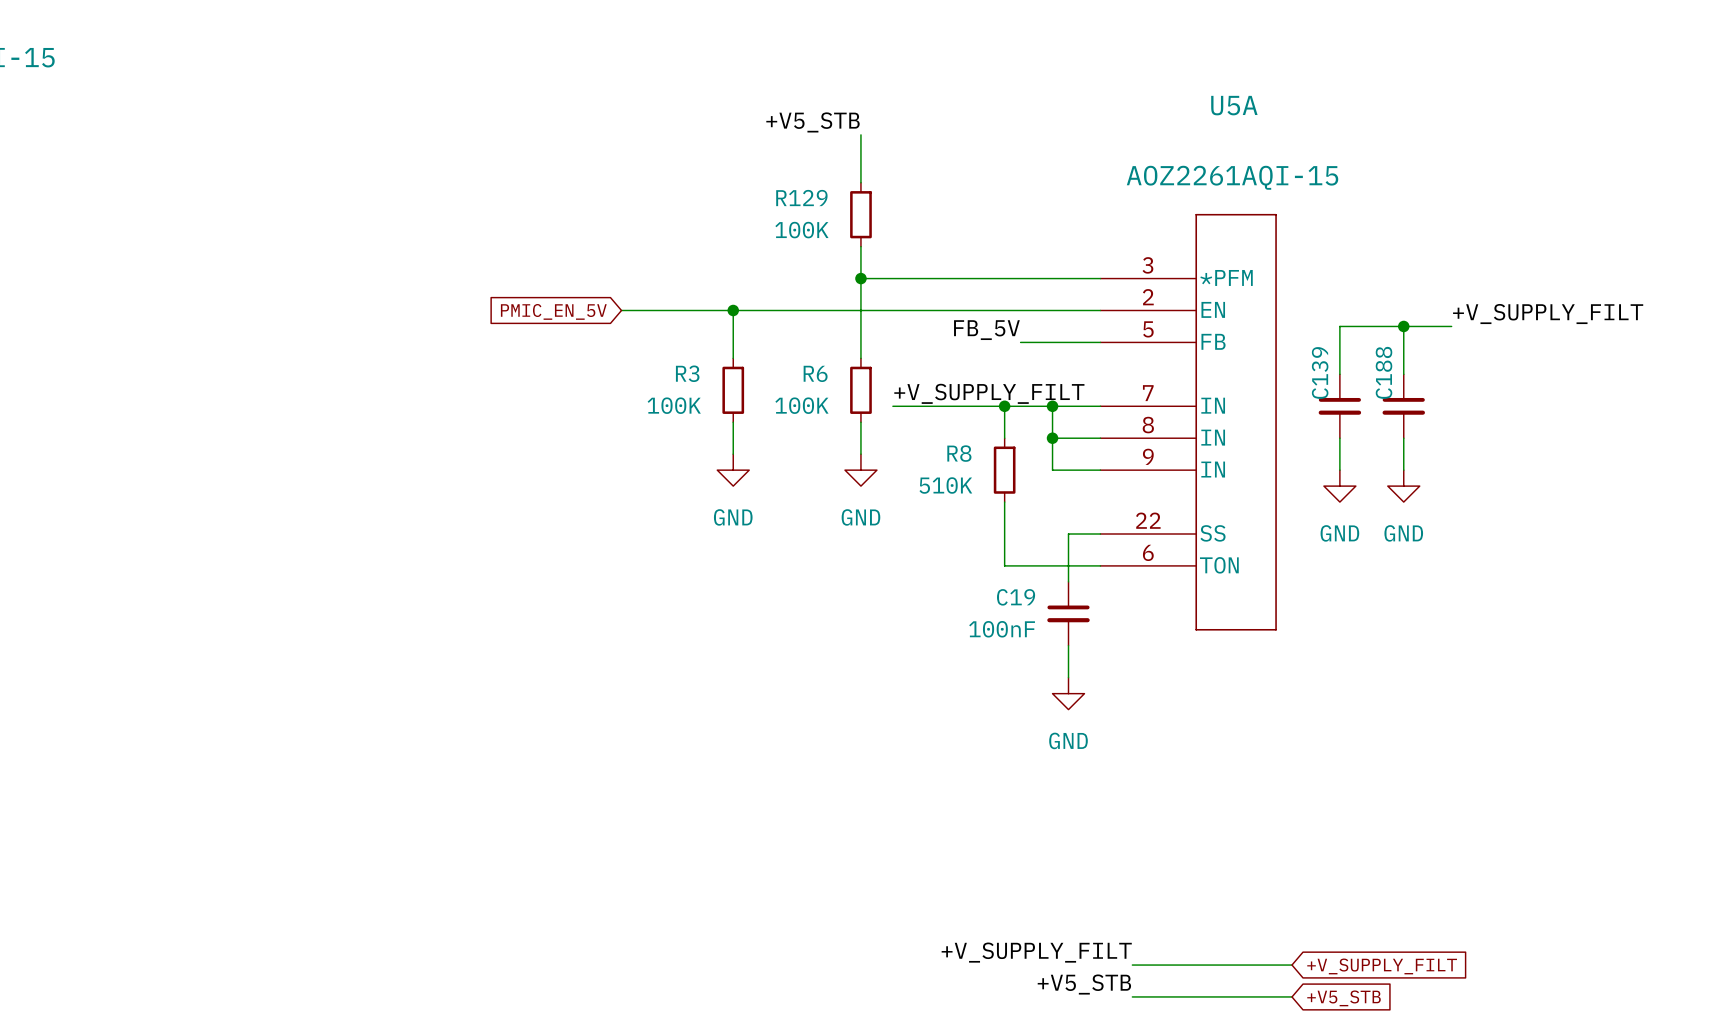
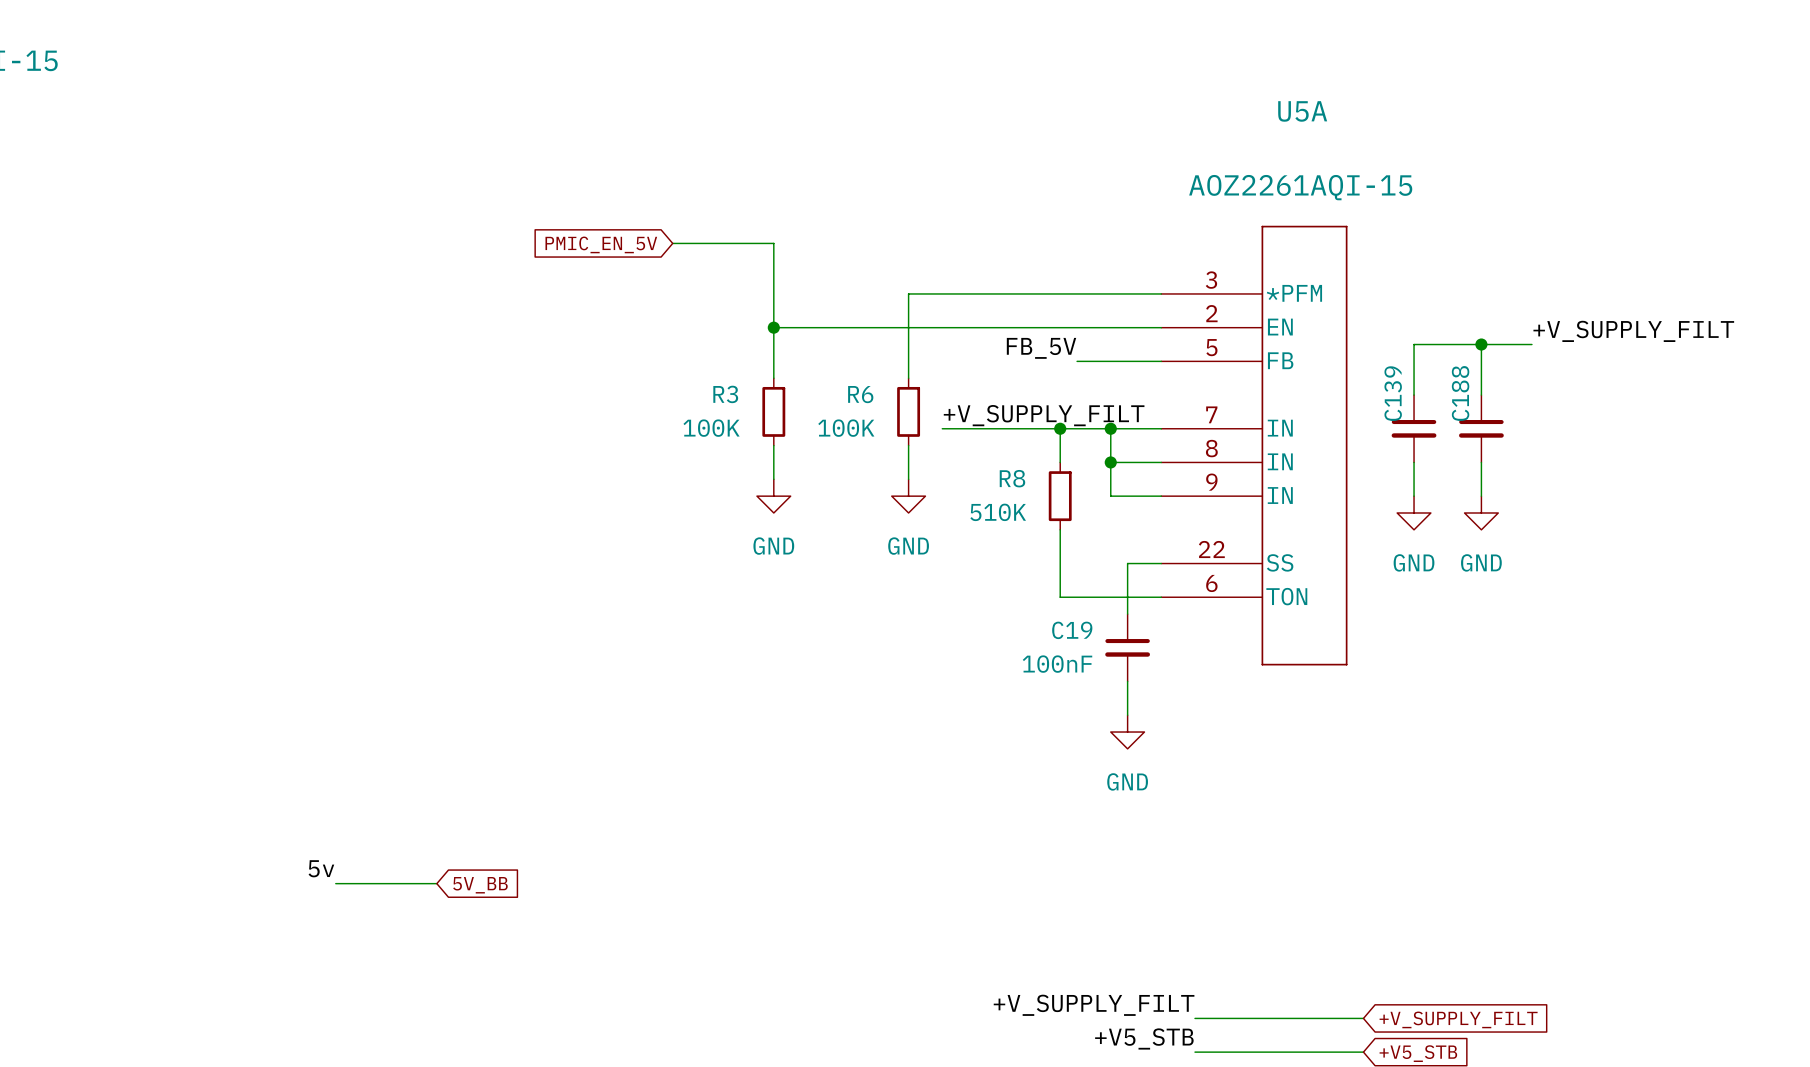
label: +V5_STB (812, 122) -> none
wire: (860, 134) (860, 182) -> none
R129: 100K (860, 214) -> none
wire: (860, 246) (860, 278) -> none
junction: (860, 278) -> none
wire: (621, 310) (733, 310) -> (672, 243) (773, 243) (773, 327)
global label position: PMIC_EN_5V (553, 311) -> PMIC_EN_5V (601, 244)
label: none -> 5v (321, 868)
wire: none -> (335, 883) (436, 883)
global label: none -> 5V_BB (480, 885)

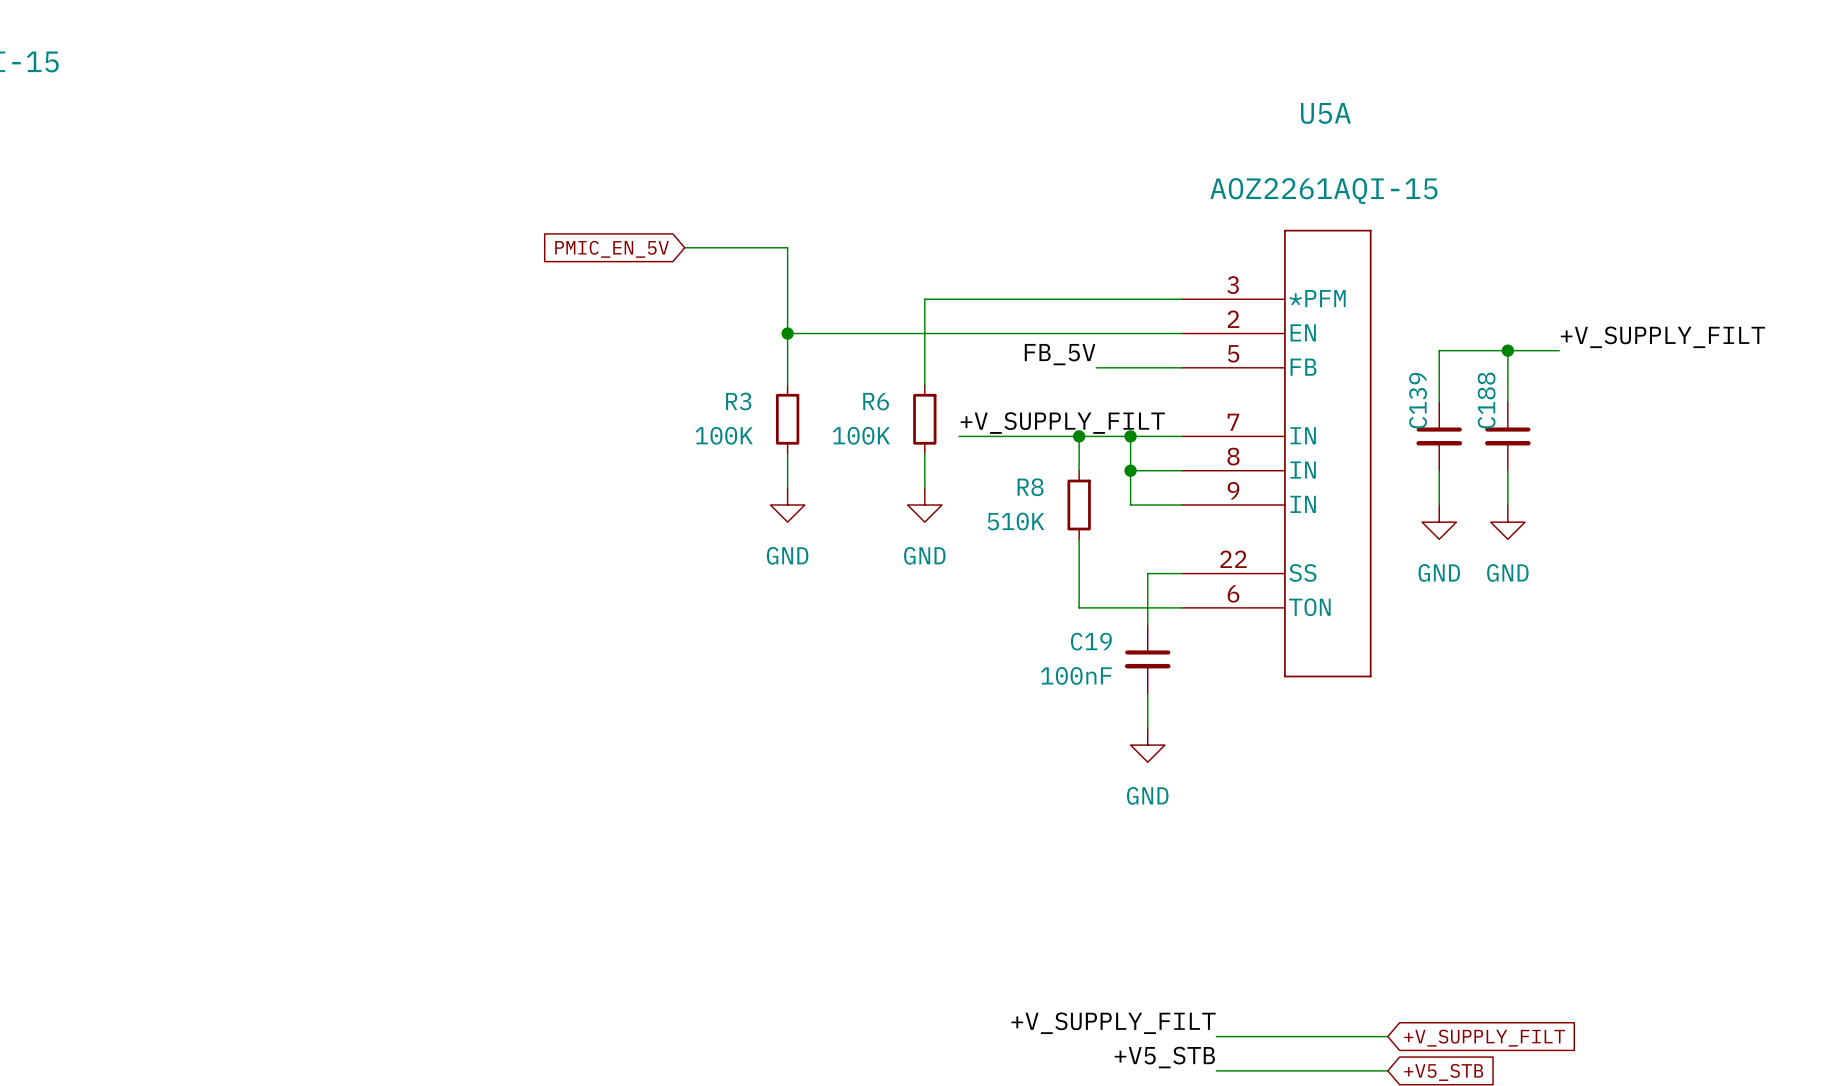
label: 5v (321, 868) -> none
wire: (335, 883) (436, 883) -> none
global label: 5V_BB (480, 885) -> none

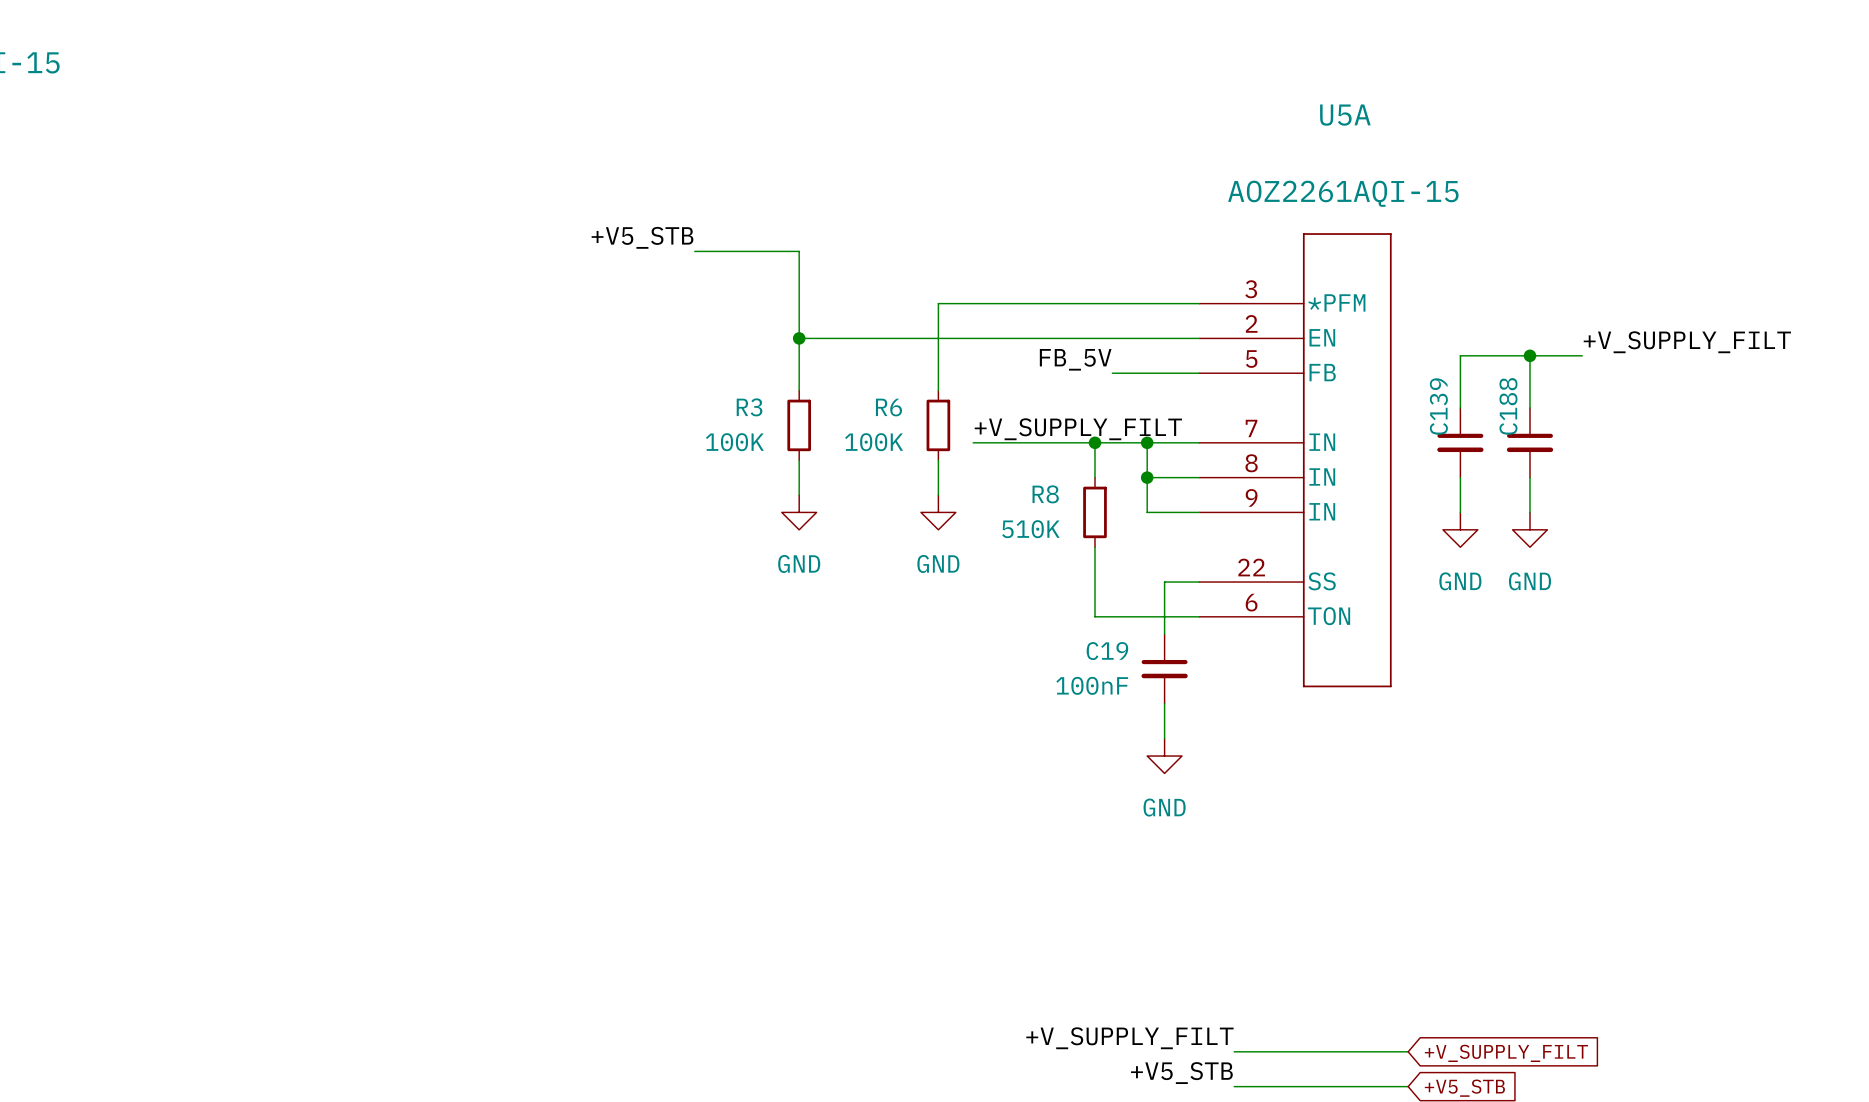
label: none -> +V5_STB (642, 237)
global label: PMIC_EN_5V (612, 249) -> none

